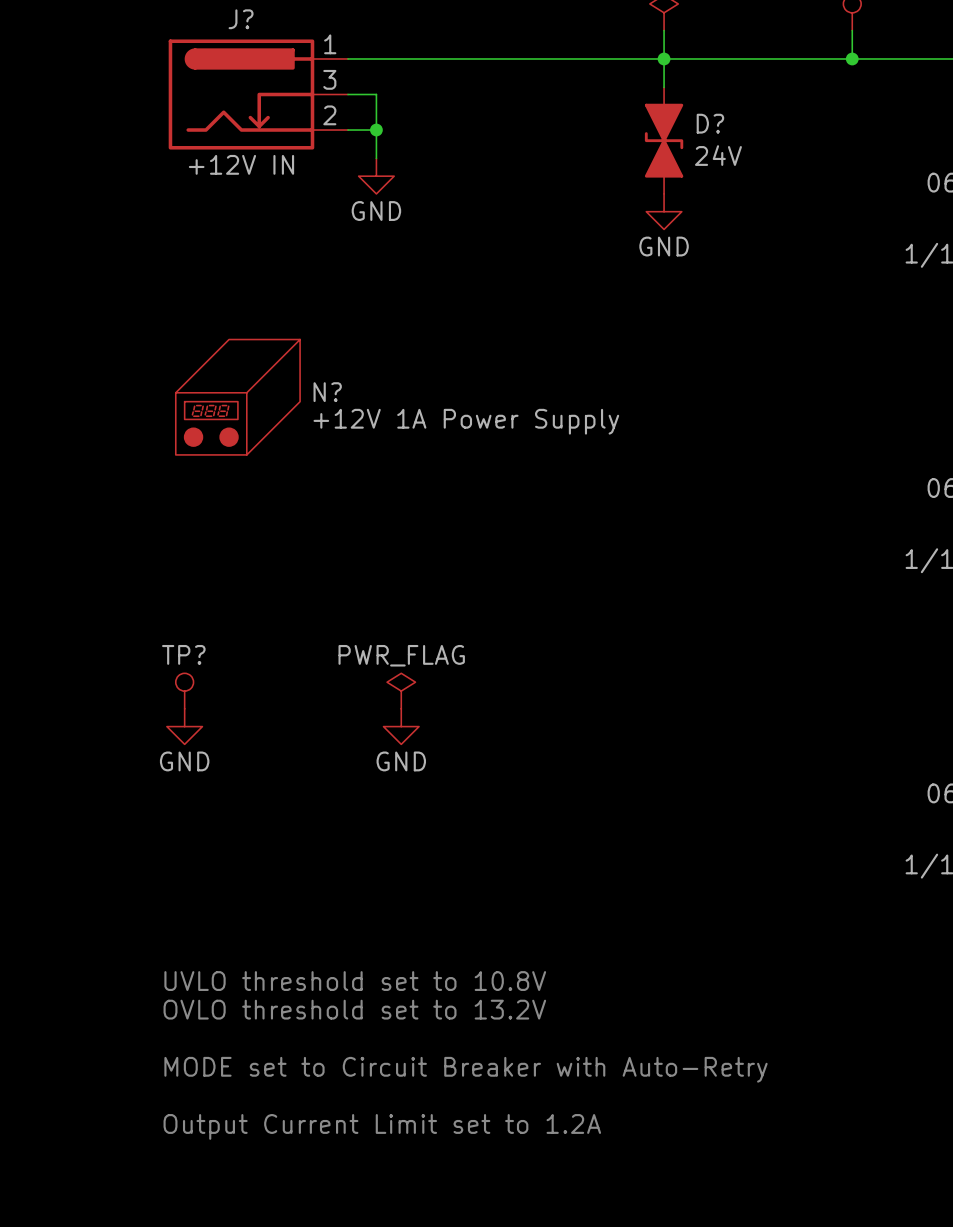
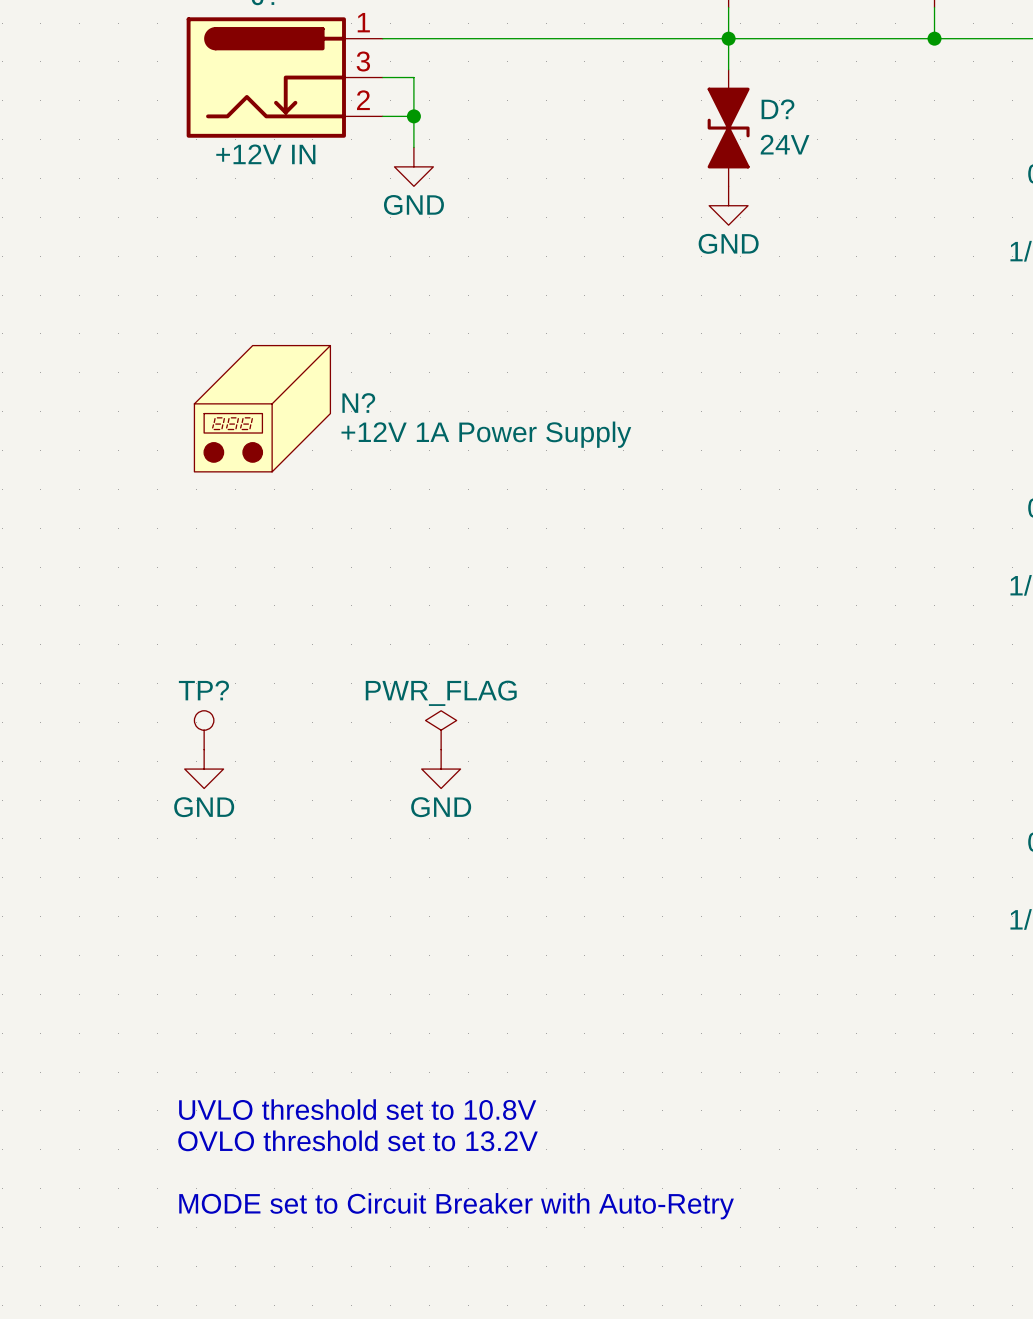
text position: UVLO threshold set to 10.8V (355, 981) -> UVLO threshold set to 10.8V (357, 1109)
text: OVLO threshold set to 13.2V (354, 1009) -> none
text: MODE set to Circuit Breaker with Auto-Retry (466, 1069) -> OVLO threshold set to 13.2V (358, 1140)
text: Output Current Limit set to 1.2A (382, 1126) -> MODE set to Circuit Breaker with Auto-Retry (456, 1206)

